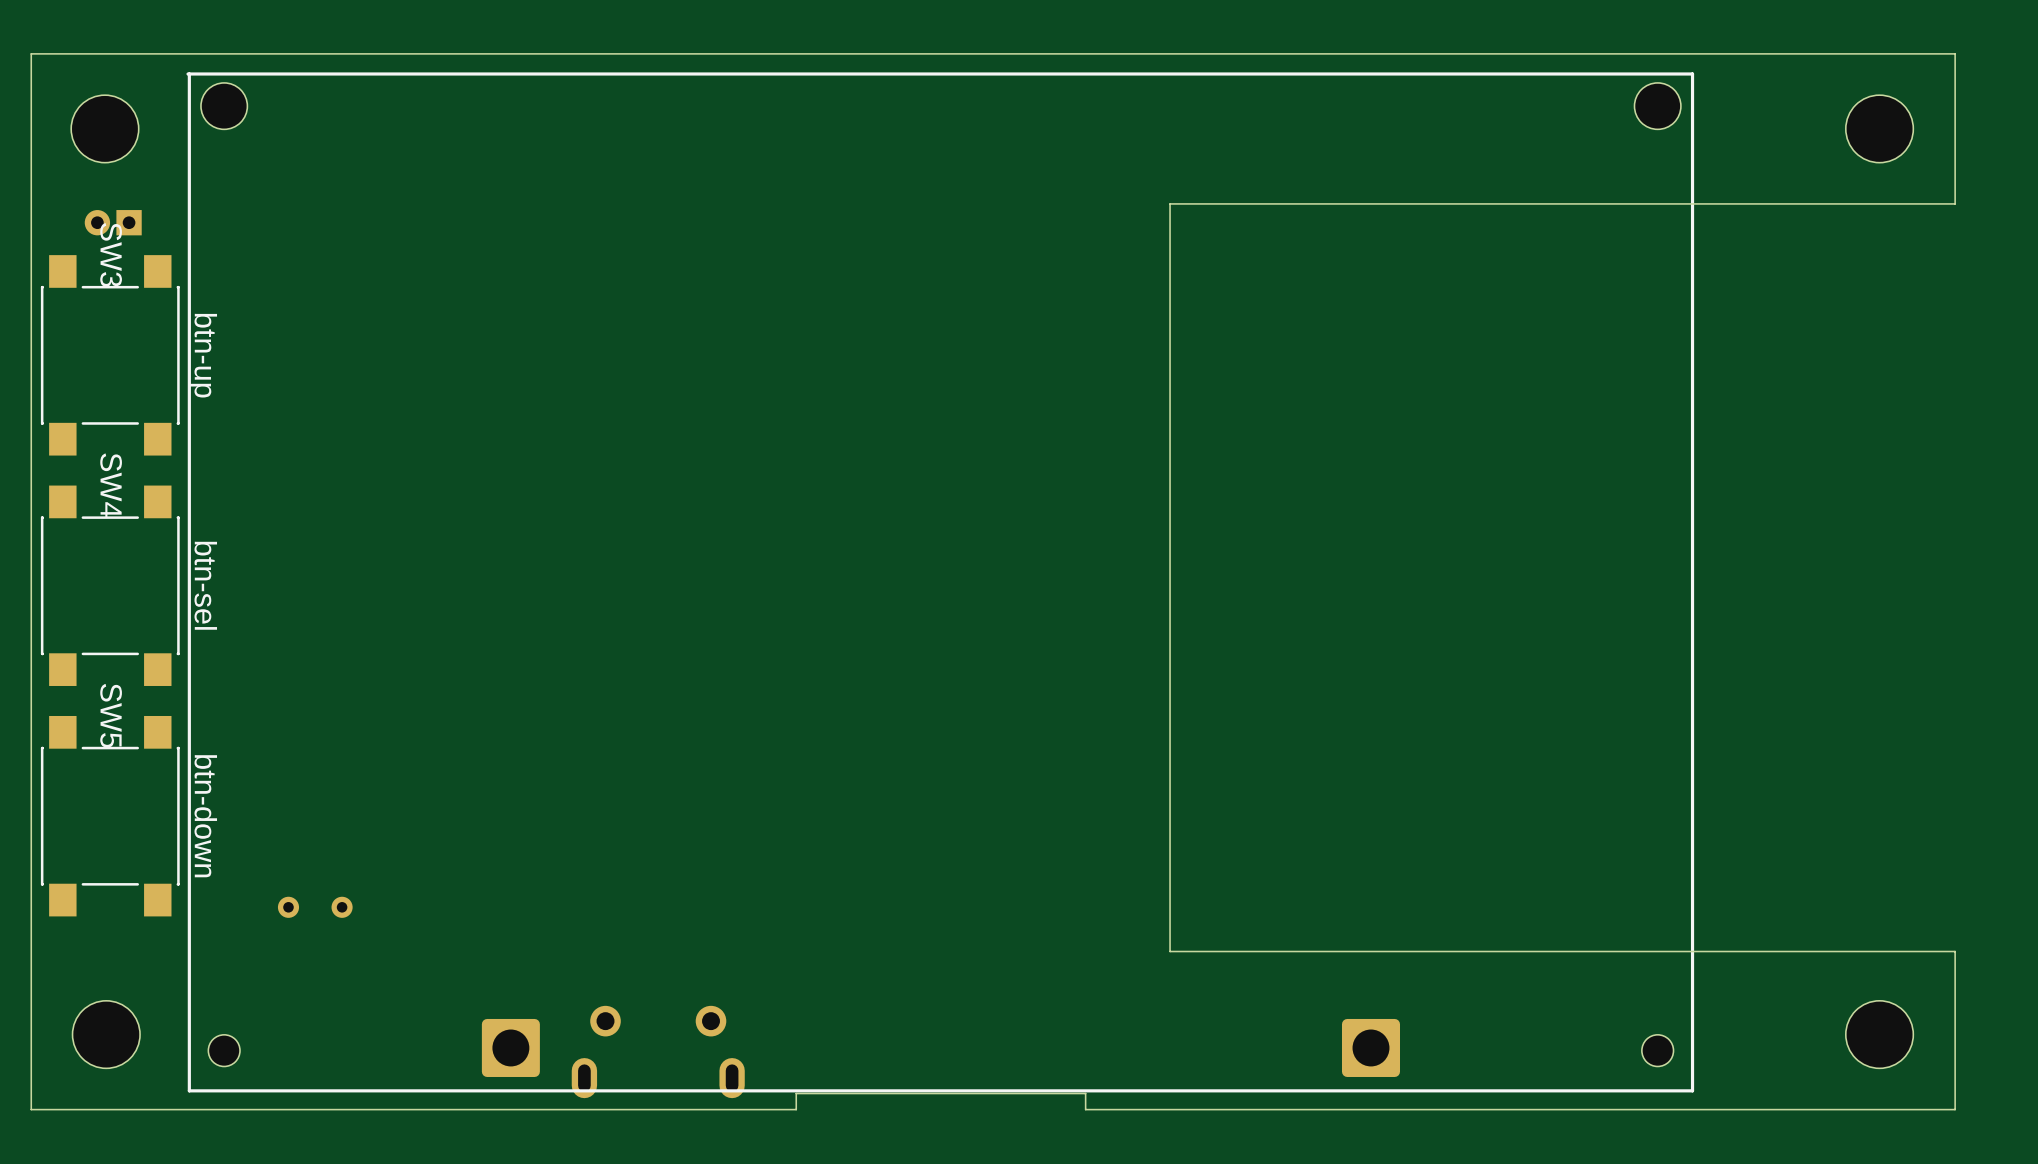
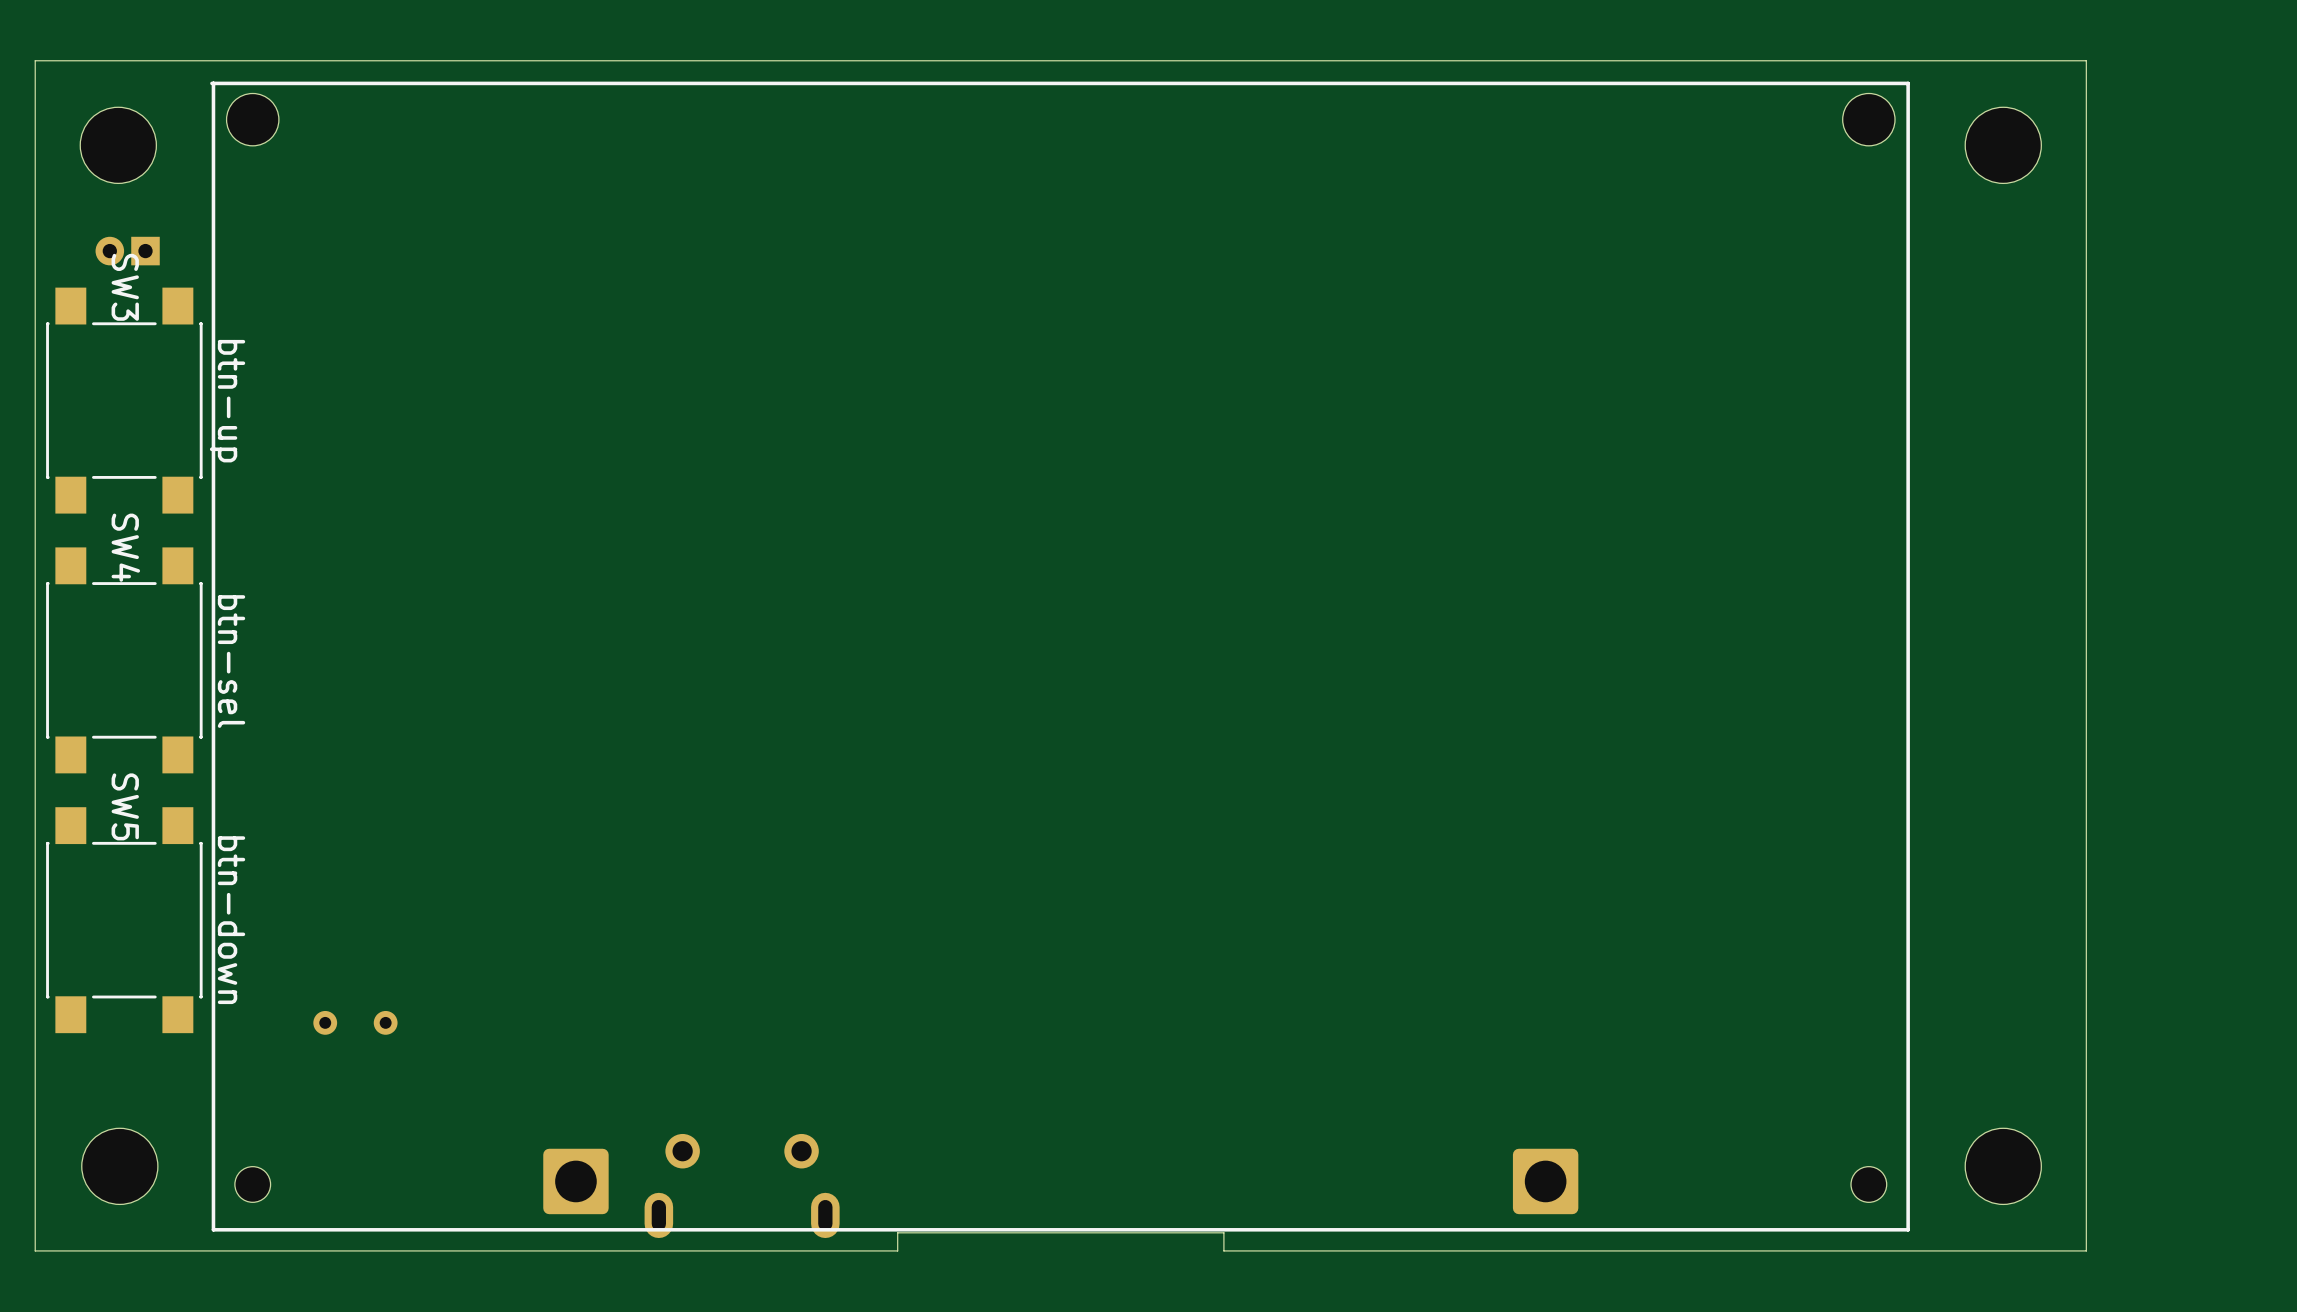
board edge: (1850, 53) (1955, 53) (1955, 203) (1170, 203) (1170, 951) (1955, 951) (1955, 1109) (1850, 1109) -> (2086, 60) (2086, 1250)
part position: (1879, 128) -> (2003, 145)
part position: (1879, 1034) -> (2003, 1166)

